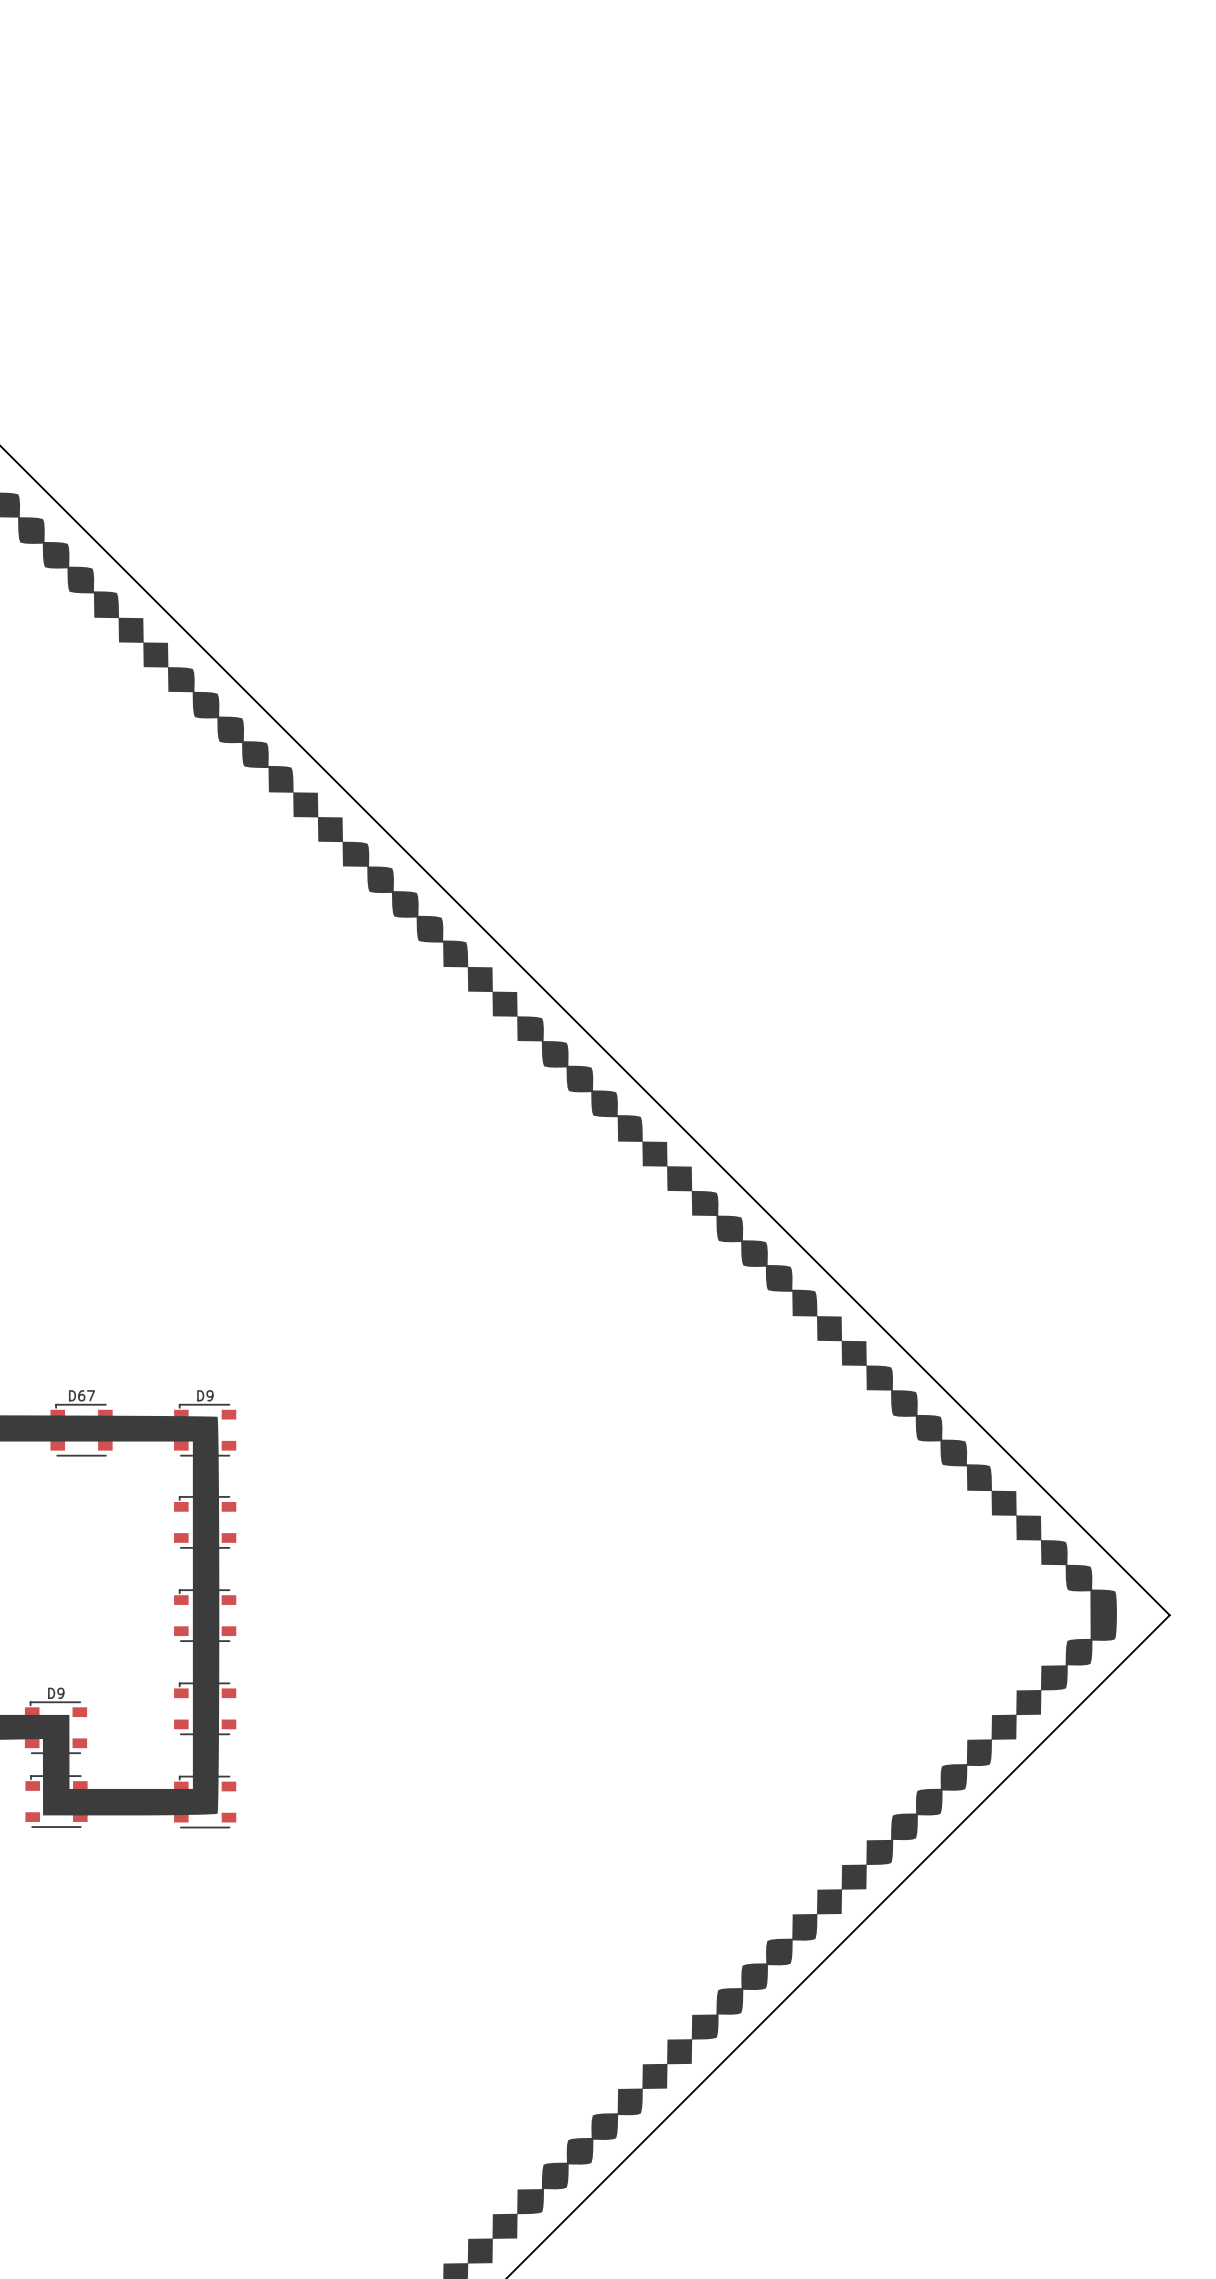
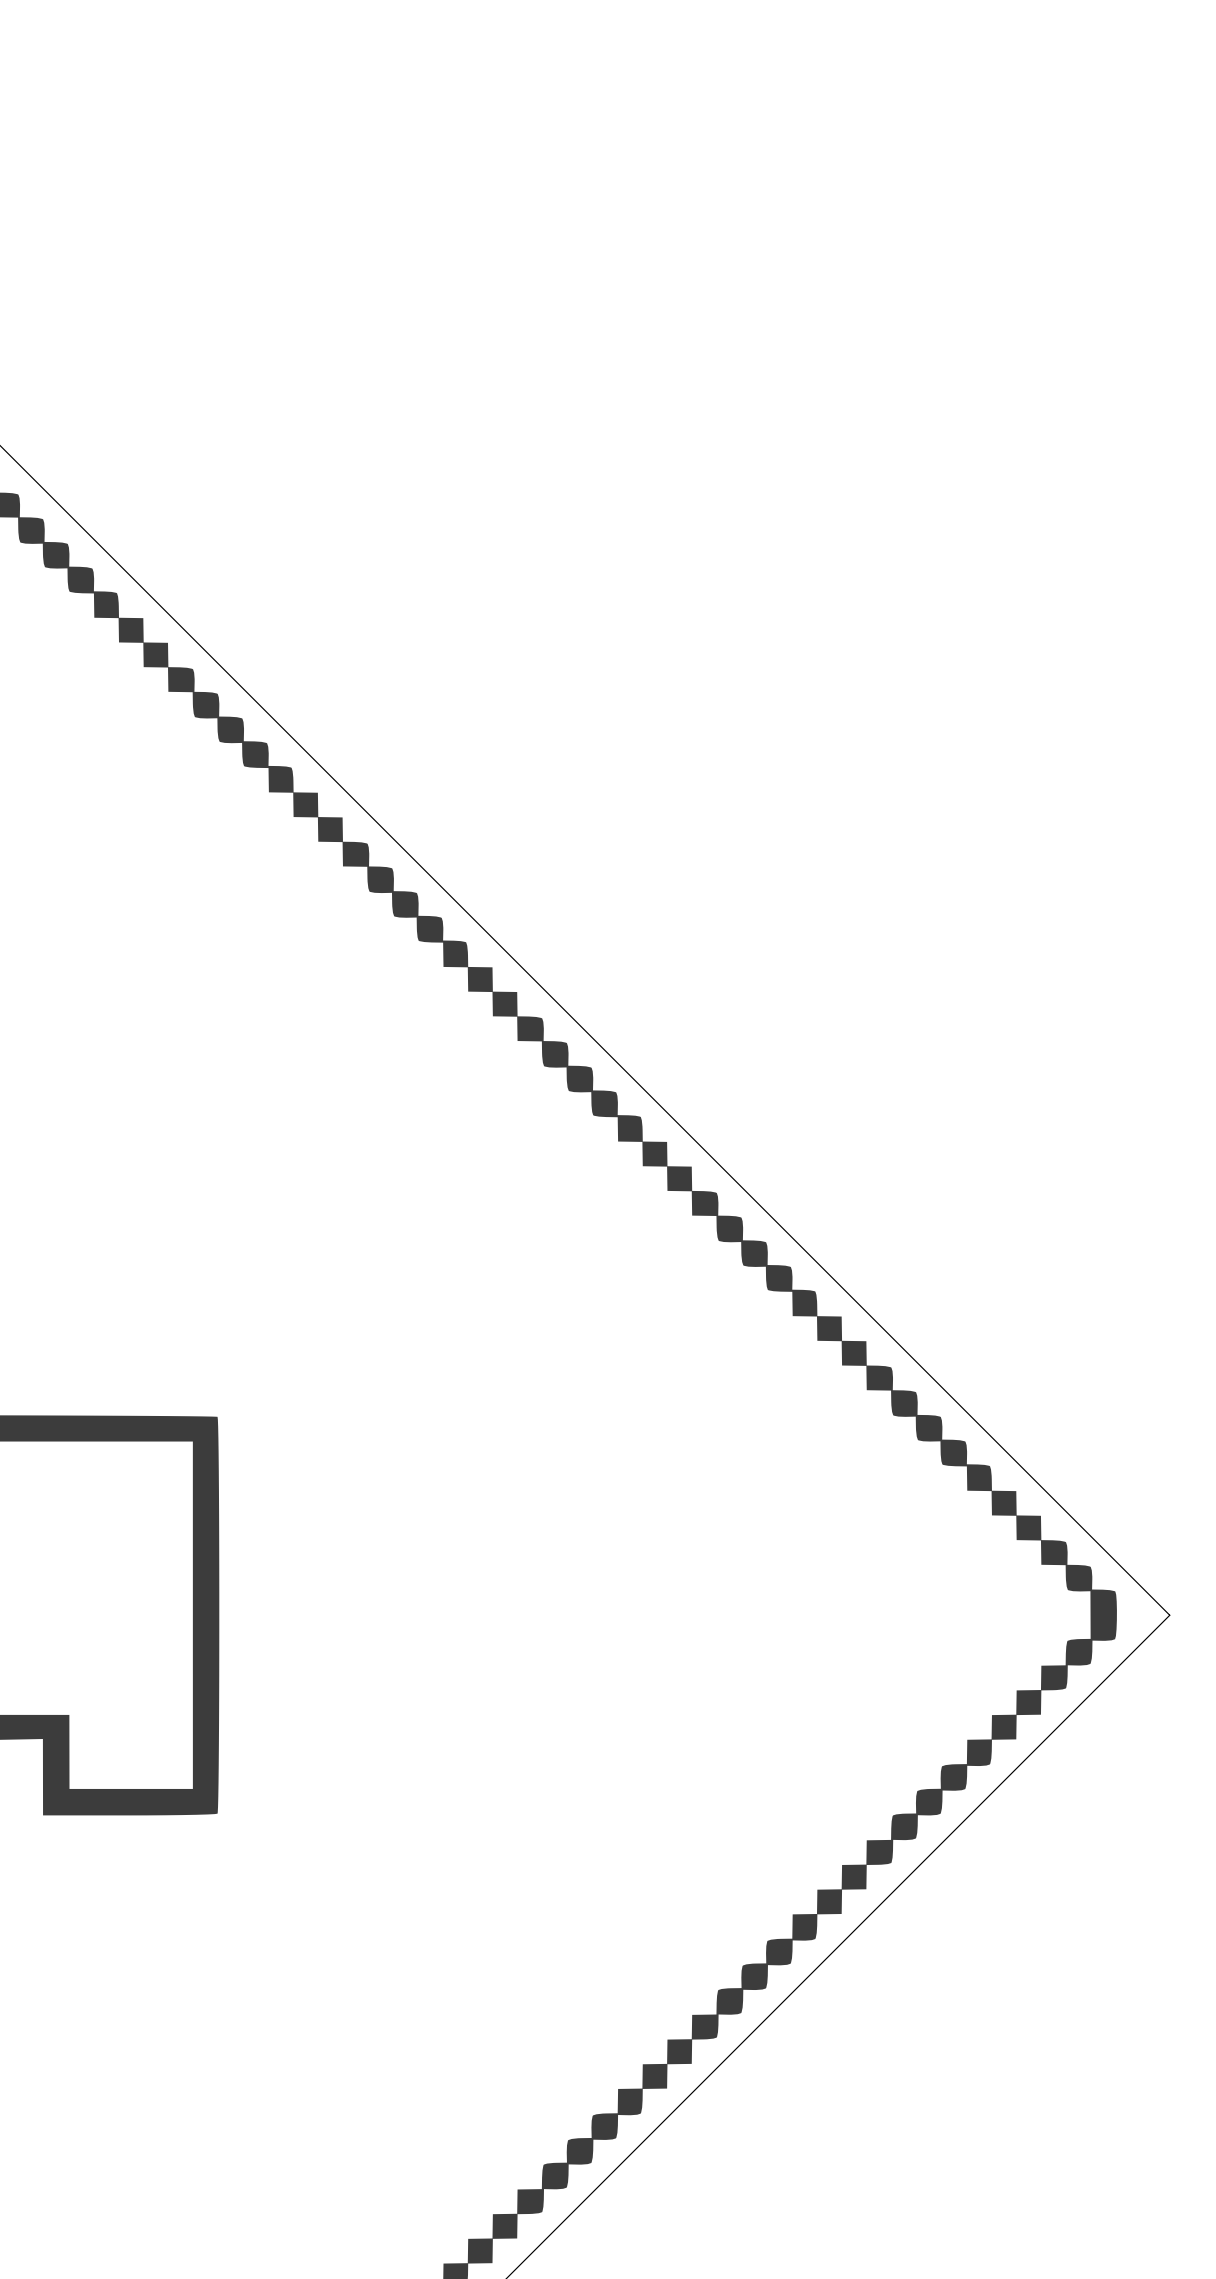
D67: (81, 1430) -> none
D9: (205, 1430) -> none
part: (205, 1522) -> none
part: (205, 1615) -> none
part: (205, 1708) -> none
D9: (56, 1727) -> none
part: (56, 1801) -> none
part: (205, 1802) -> none

